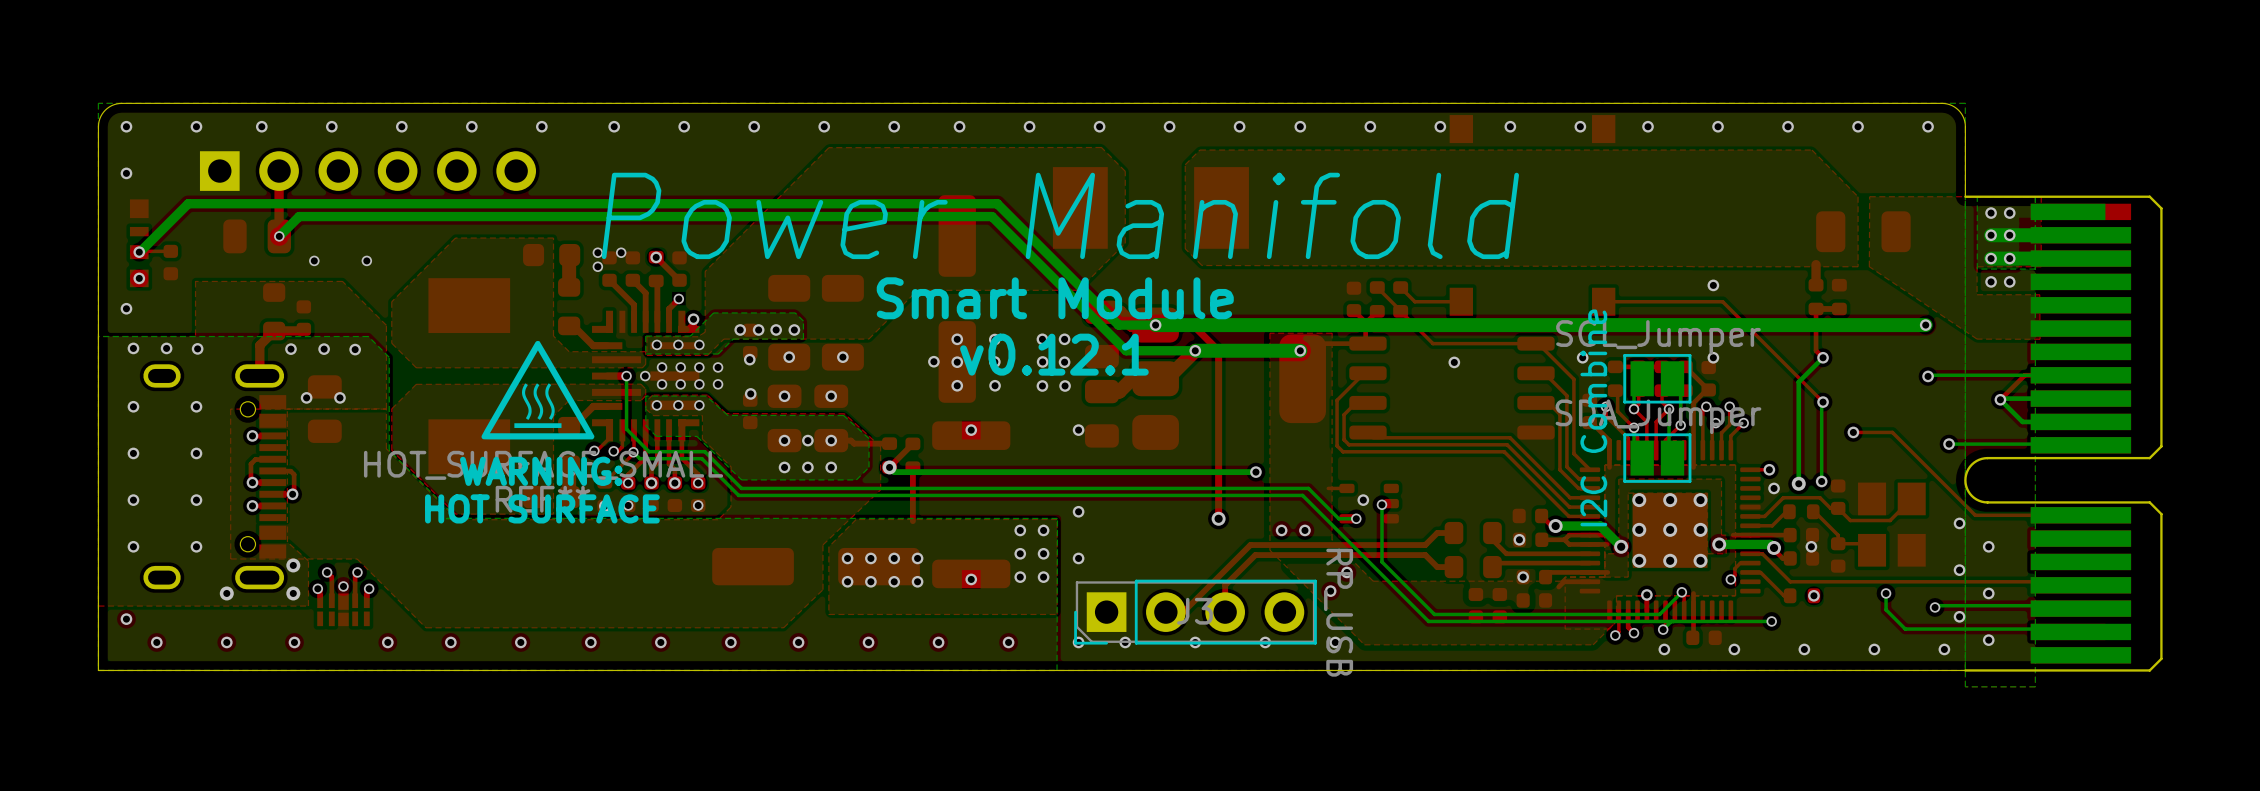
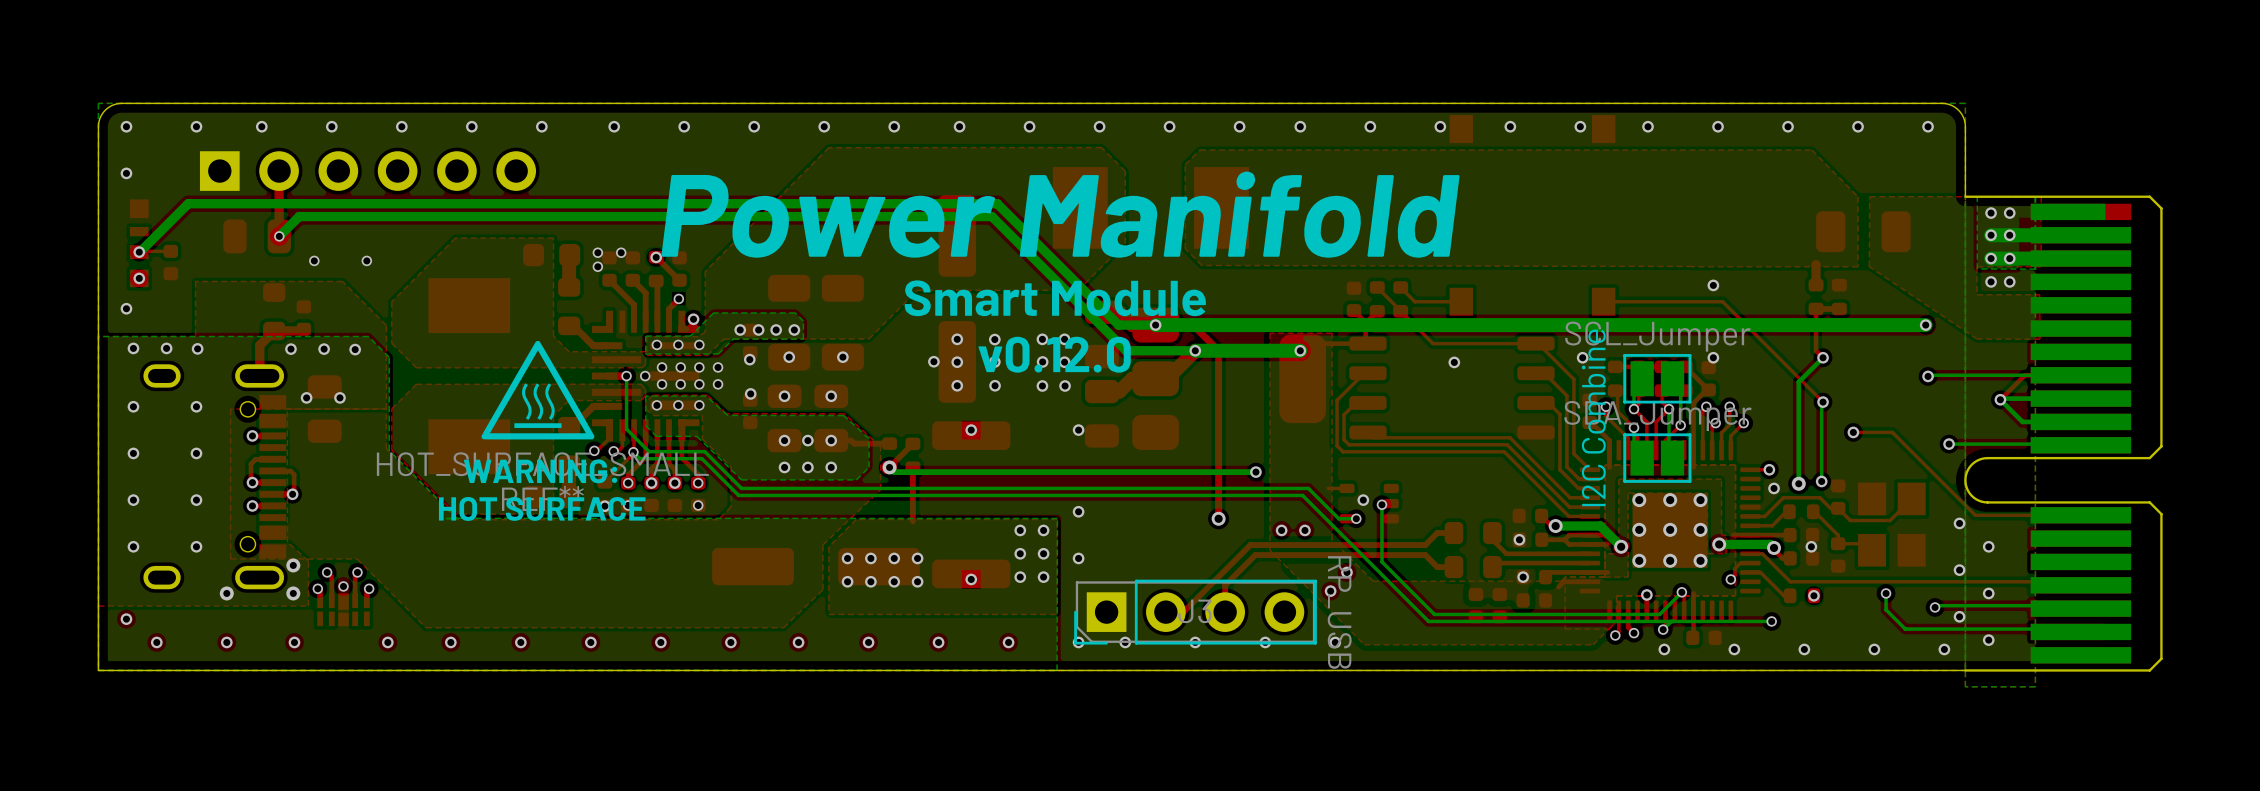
text: v0.12.1 (1054, 354) -> v0.12.0 (1054, 354)

